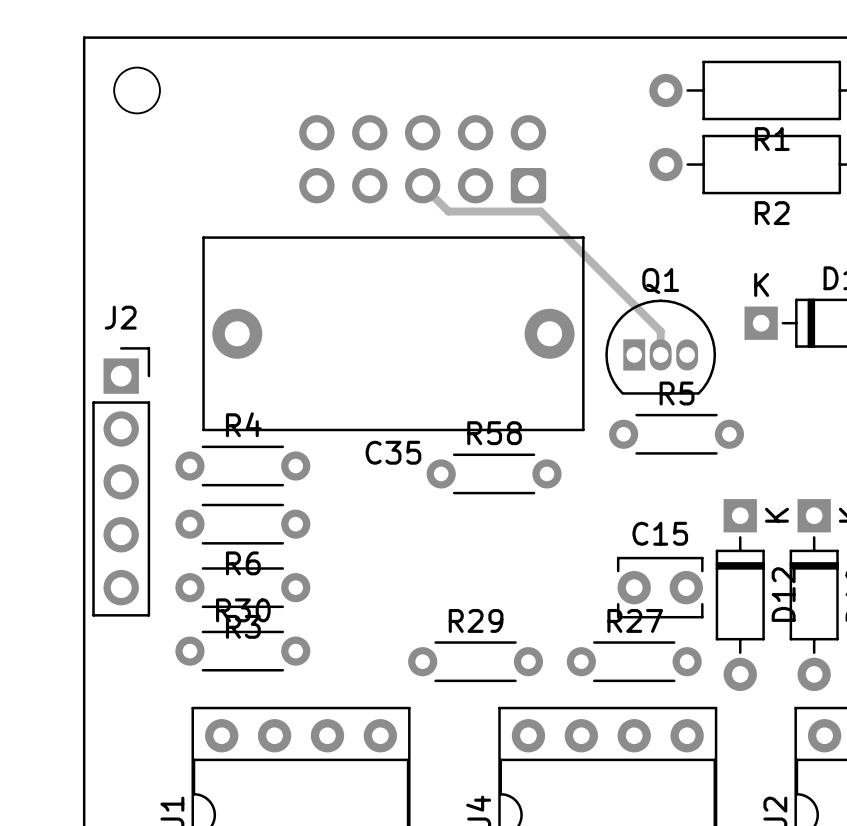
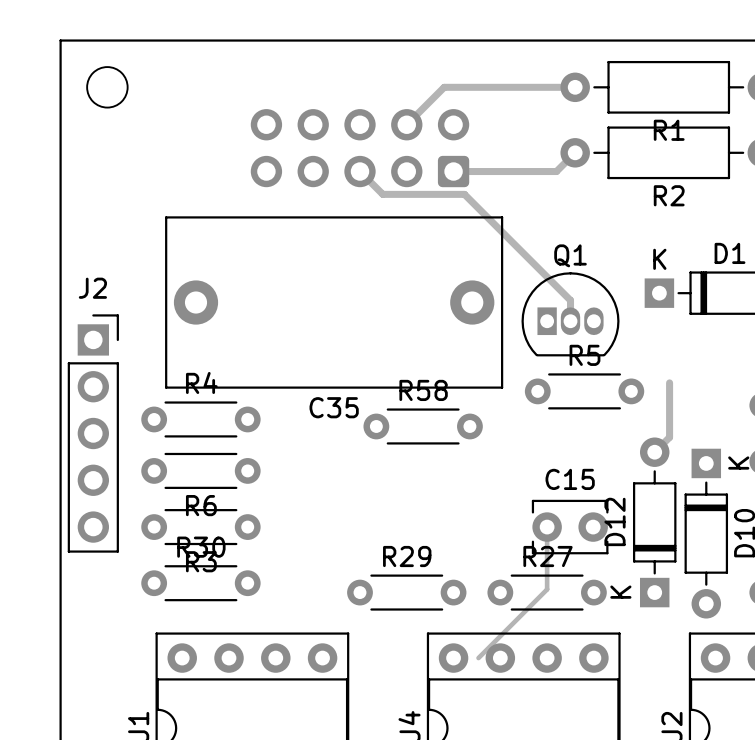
track: none -> (575, 87) (444, 87) (406, 124)
track: none -> (575, 152) (556, 171) (453, 171)
track: none -> (669, 382) (669, 437) (654, 452)
track: none -> (547, 527) (547, 589) (478, 658)
D12 rotation: 0° (740, 595) -> 180° (654, 522)

